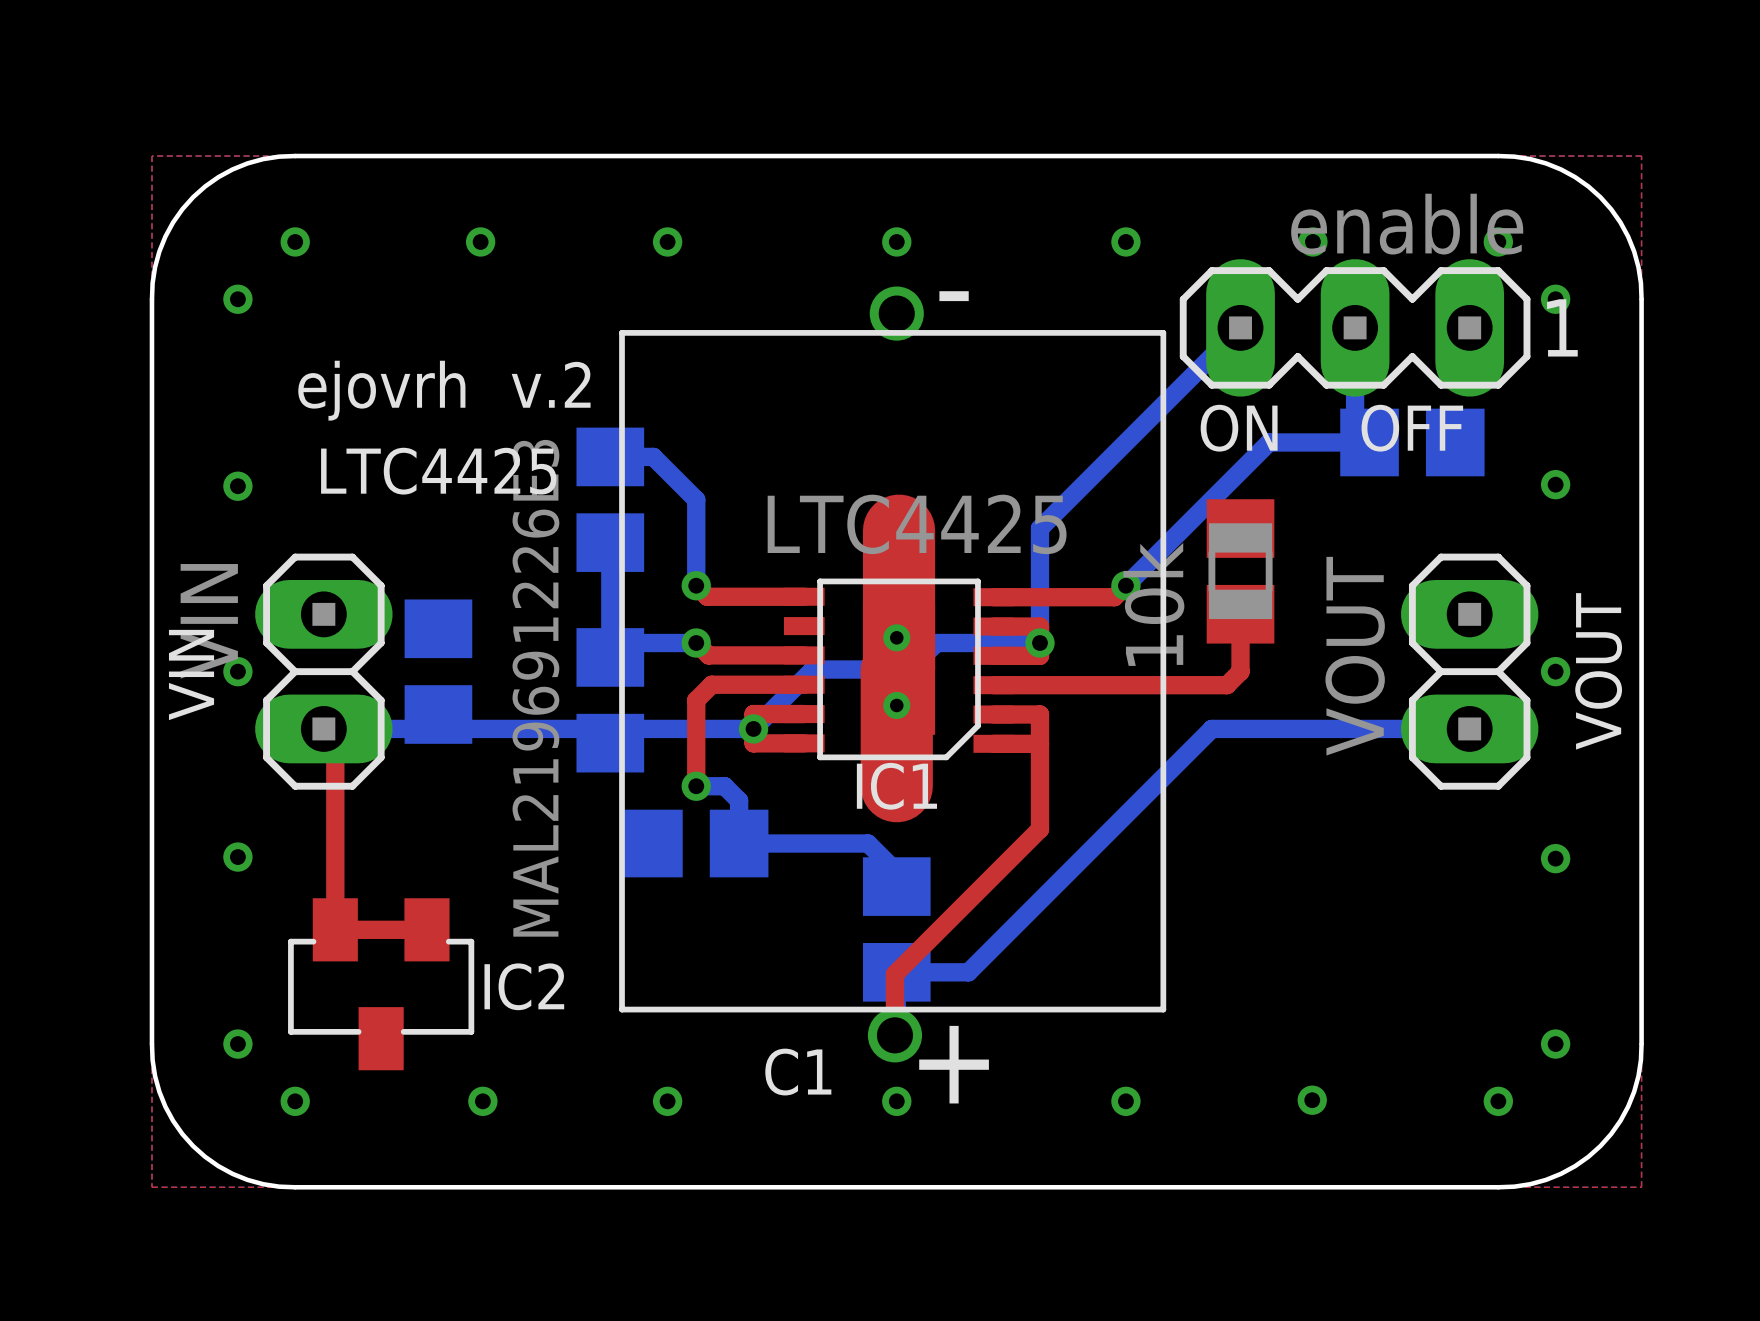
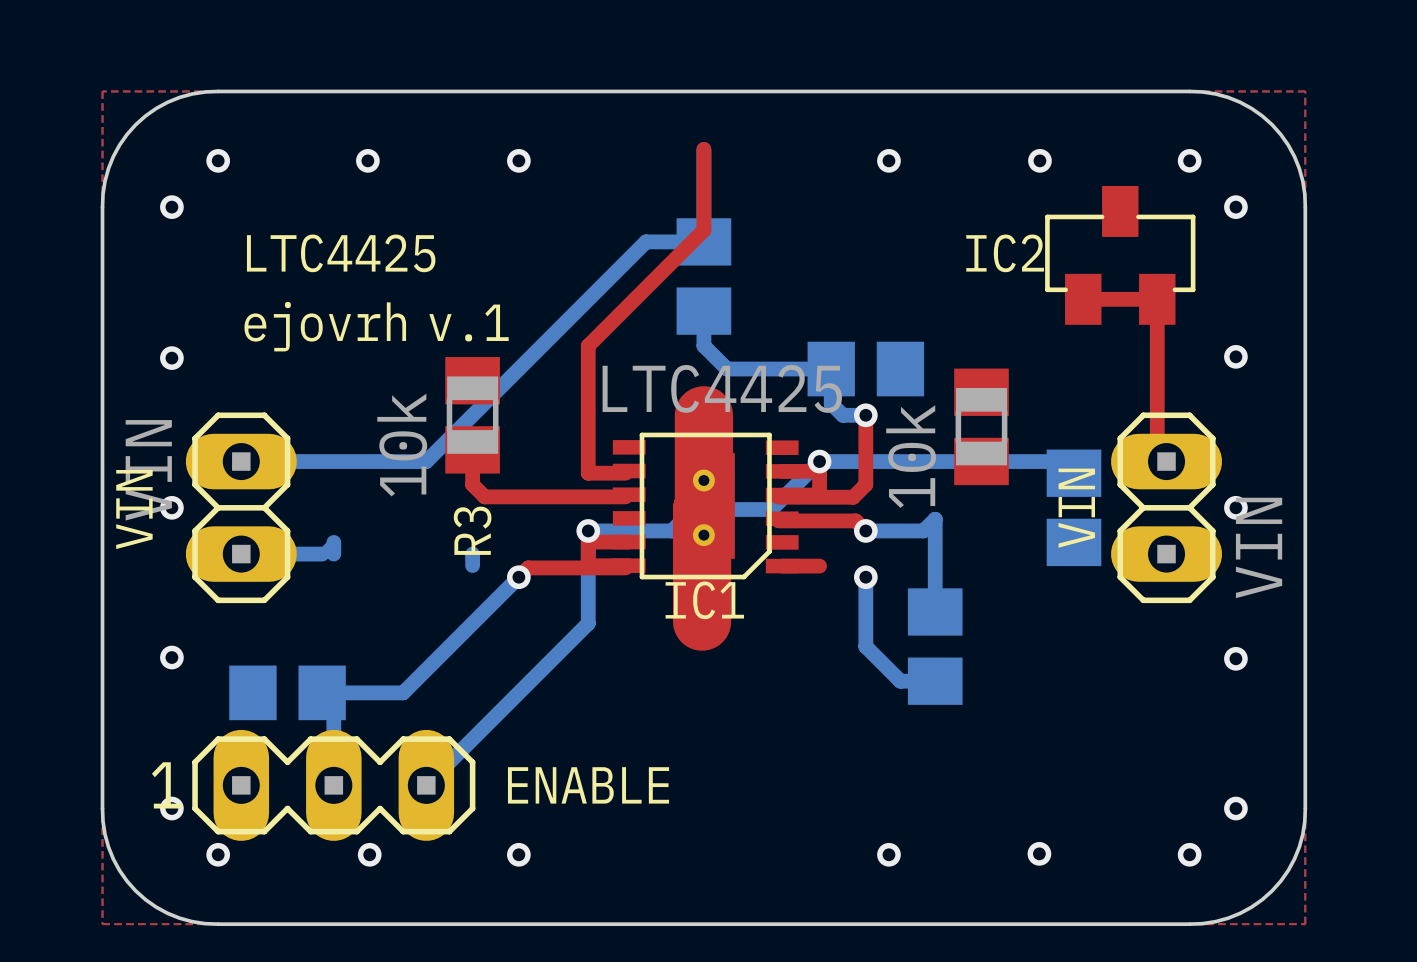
bottom track: none -> (703, 149) (703, 241) (646, 241) (426, 461) (241, 461)
top track: none -> (703, 149) (703, 230) (588, 345) (588, 473) (625, 473)
via: (896, 241) -> none
bottom track: (1240, 327) (1040, 528) (1040, 643) (936, 643) (909, 669) (812, 669) (753, 728) (438, 728) (431, 721) -> none
bottom track: (1355, 327) (1355, 428) (1369, 442) (1269, 442) (1125, 585) -> none
part: enable (1355, 327) -> none
text: v.2 (551, 384) -> v.1 (469, 323)
part: none -> (703, 276)
text position: ejovrh (381, 390) -> ejovrh (325, 326)
top track: none -> (1083, 299) (1157, 299) (1157, 452) (1166, 461)
bottom track: none -> (703, 311) (703, 345) (727, 369) (831, 369) (831, 403) (842, 415) (865, 415)
text: ON (1239, 428) -> none
text: OFF (1412, 428) -> none
part: (1412, 442) -> none
bottom track: (610, 456) (653, 456) (696, 499) (696, 585) -> none
text position: LTC4425 (438, 471) -> LTC4425 (341, 253)
R3 side: bottom (610, 499) -> top (472, 415)
part: none -> (865, 369)
top track: (896, 528) (899, 530) (896, 786) -> none
bottom track: (610, 542) (610, 657) (624, 643) (696, 643) -> none
top track: none -> (703, 415) (703, 507) (702, 509) (702, 621) (703, 623)
top track: none -> (865, 415) (865, 484) (853, 497) (778, 497)
top track: (696, 585) (707, 596) (804, 596) -> none
via: (696, 585) -> none
top track: (1125, 585) (1114, 597) (993, 597) -> none
via position: (1125, 585) -> (865, 415)
top track: none -> (472, 449) (472, 484) (484, 496) (625, 496)
top track: (1240, 614) (1240, 671) (1226, 685) (993, 685) -> none
bottom track: none -> (1079, 467) (1074, 461) (819, 461) (771, 509) (693, 509) (671, 530) (588, 530) (588, 623) (426, 785)
top track: (696, 643) (708, 655) (804, 655) -> none
via: (696, 643) -> none
via position: (1040, 643) -> (819, 461)
VOUT value: VOUT (1355, 656) -> VIN (1259, 547)
part: (438, 671) -> none
part: none -> (1074, 507)
VOUT name: VOUT (1598, 671) -> VIN (1076, 508)
C1: MAL219691226E3 (892, 674) -> none
top track: (804, 684) (711, 684) (696, 700) (696, 786) -> none
top track: none -> (778, 520) (855, 520) (865, 530)
part: (610, 700) -> none
bottom track: none -> (865, 530) (923, 530) (935, 519) (935, 611)
via: none -> (865, 530)
top track: (993, 714) (1040, 714) (1040, 829) (894, 974) (894, 1035) -> none
top track: (323, 728) (335, 740) (335, 929) (426, 929) -> none
via position: (753, 728) -> (588, 530)
bottom track: (1469, 728) (1211, 728) (968, 972) (896, 972) (896, 1047) (894, 1035) -> none
top track: none -> (625, 567) (528, 567) (518, 577)
bottom track: none -> (518, 577) (403, 692) (322, 692) (333, 704) (333, 785)
bottom track: none -> (865, 577) (865, 646) (900, 681) (935, 681)
via: none -> (865, 577)
bottom track: (696, 786) (724, 786) (739, 800) (739, 843) (868, 843) (896, 872) (896, 886) -> none
via position: (696, 786) -> (518, 577)
part: (696, 843) -> none
part: none -> (935, 646)
part: none -> (287, 692)
part: (896, 929) -> none
IC2 rotation: 0° (381, 984) -> 180° (1120, 255)
IC2 position: (381, 984) -> (1120, 255)
ENABLE: none -> (333, 785)
via: (896, 1101) -> none

